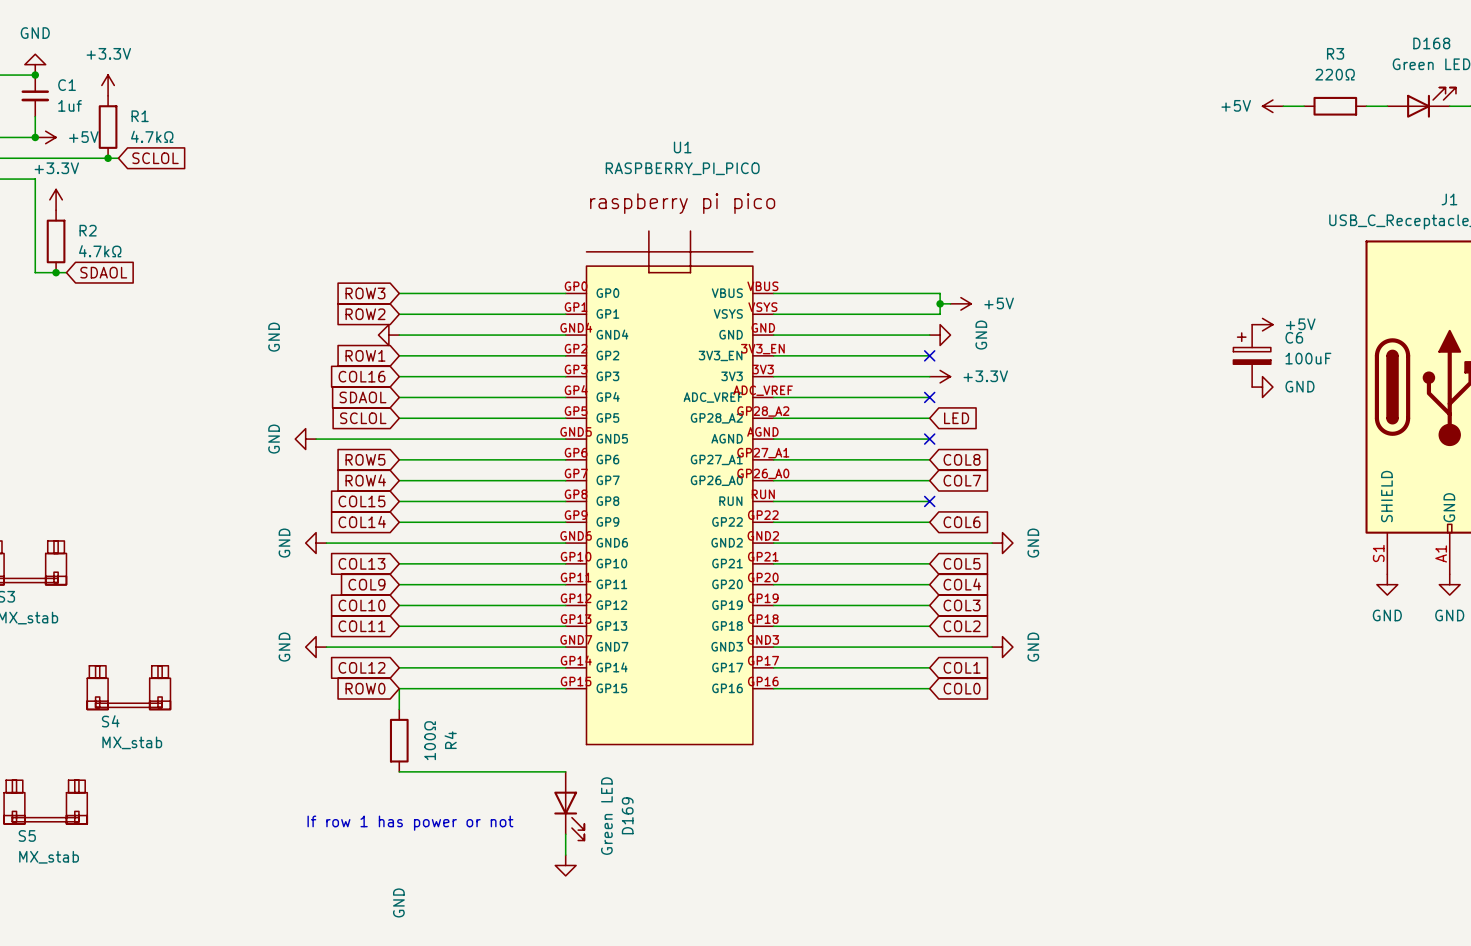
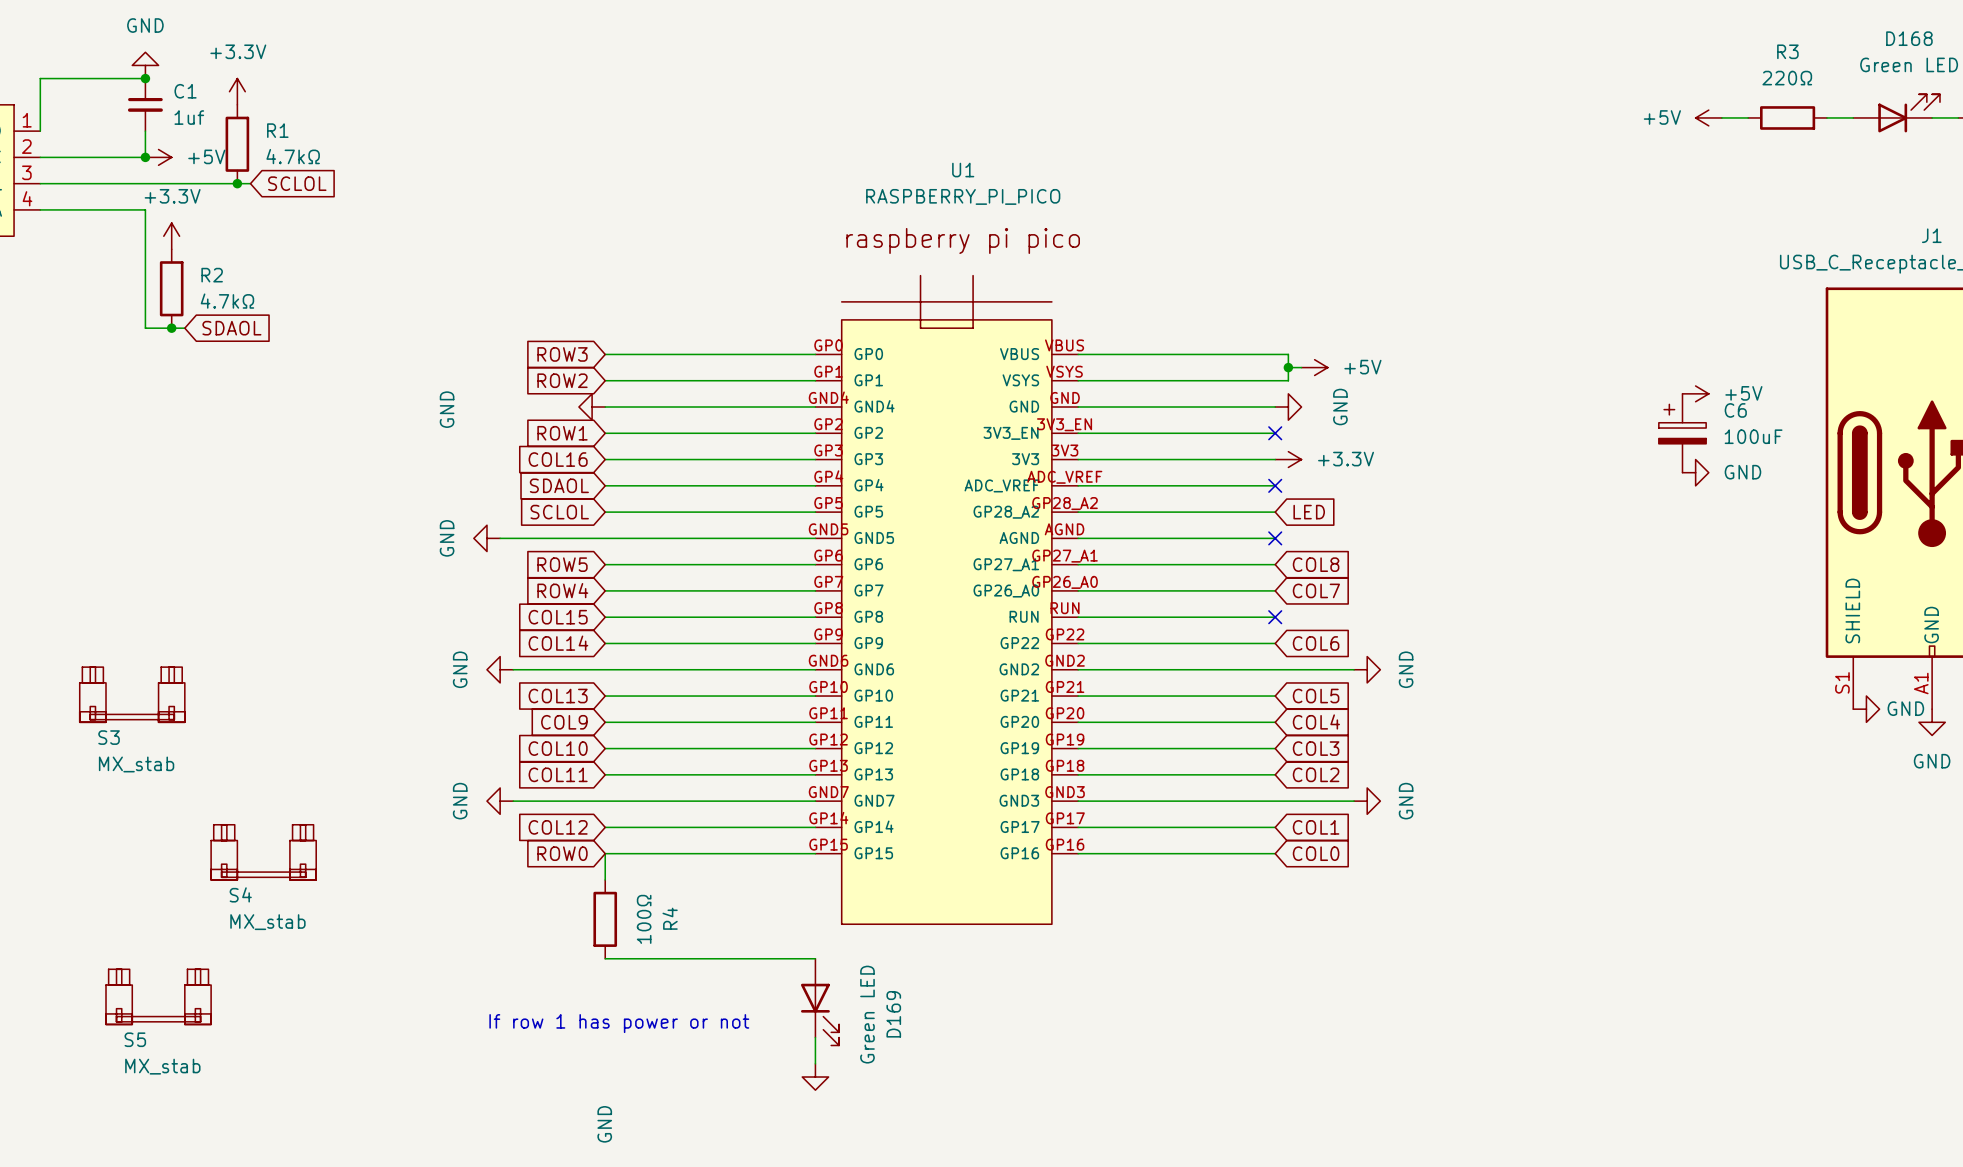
power symbol rotation: 0° (1387, 584) -> 90° counterclockwise (1866, 709)
power symbol position: GND (1387, 584) -> GND (1866, 709)

